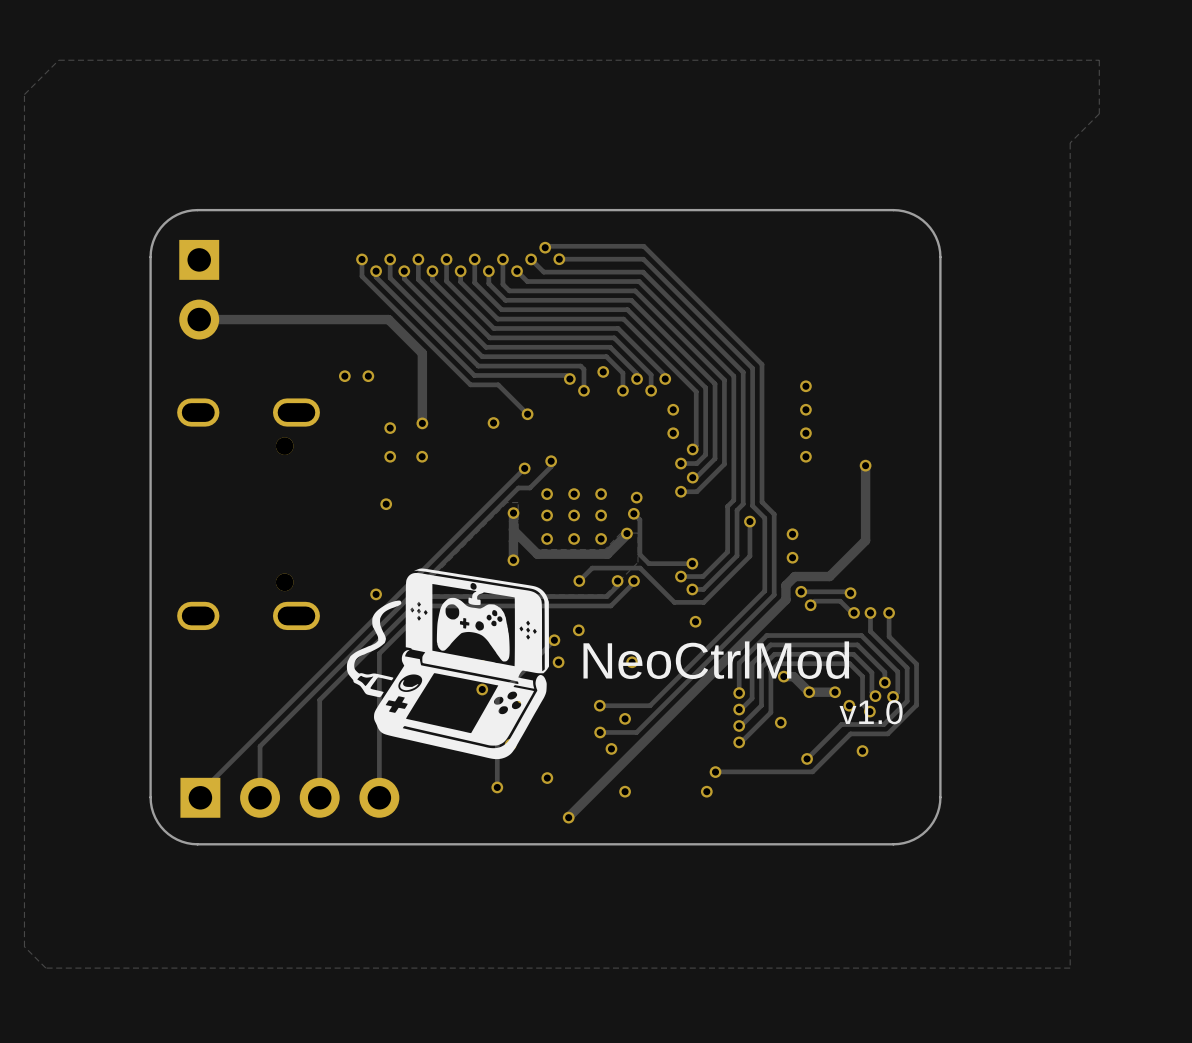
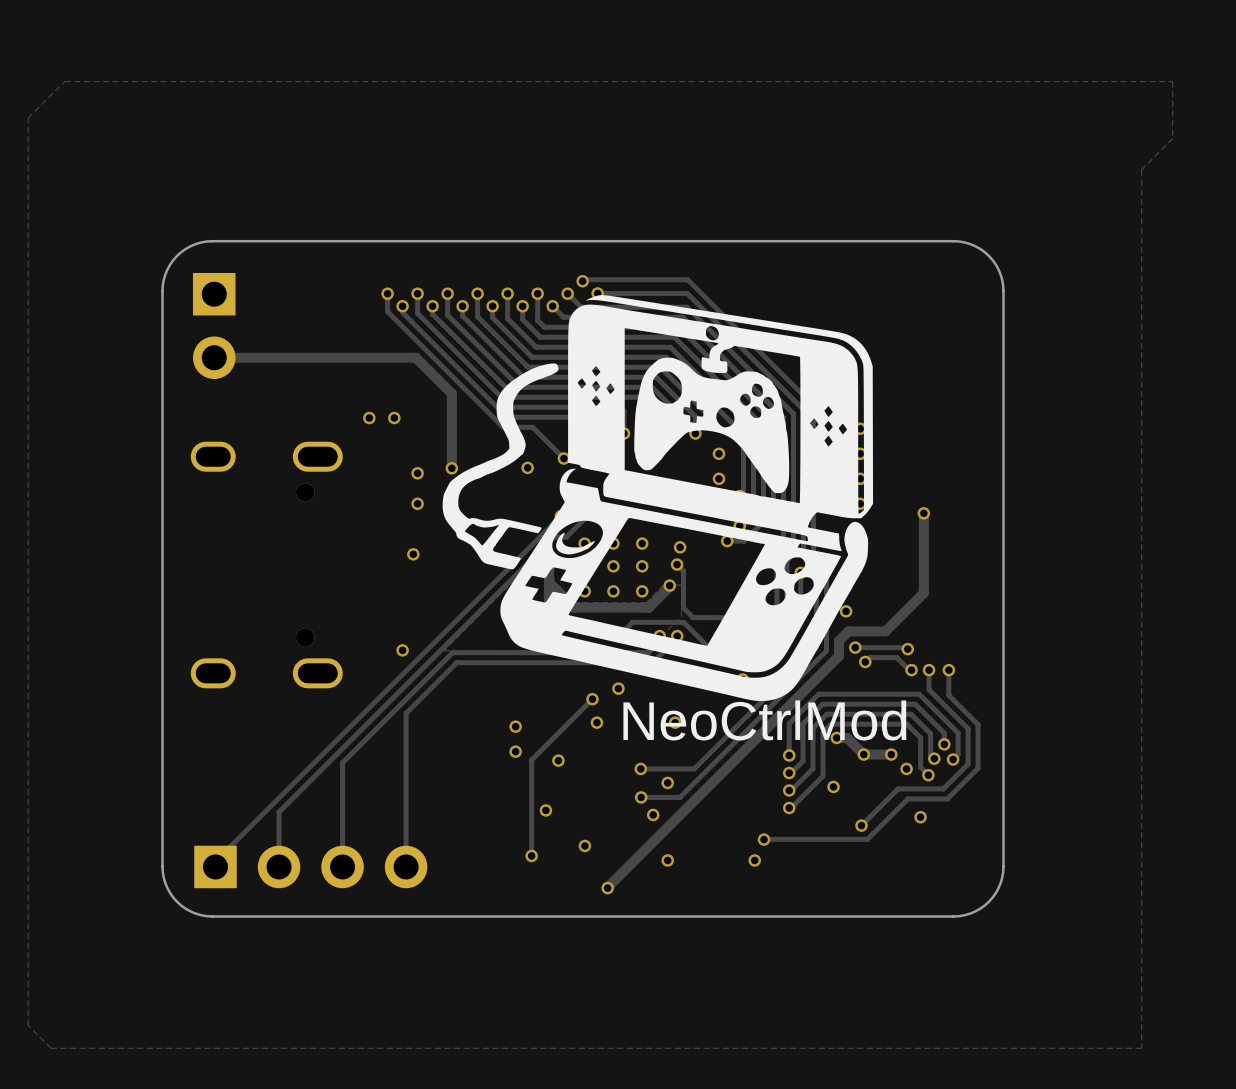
drawing: none -> [442, 295, 874, 702]
drawing: [346, 568, 550, 760] -> none
text: v1.0 (871, 712) -> none

